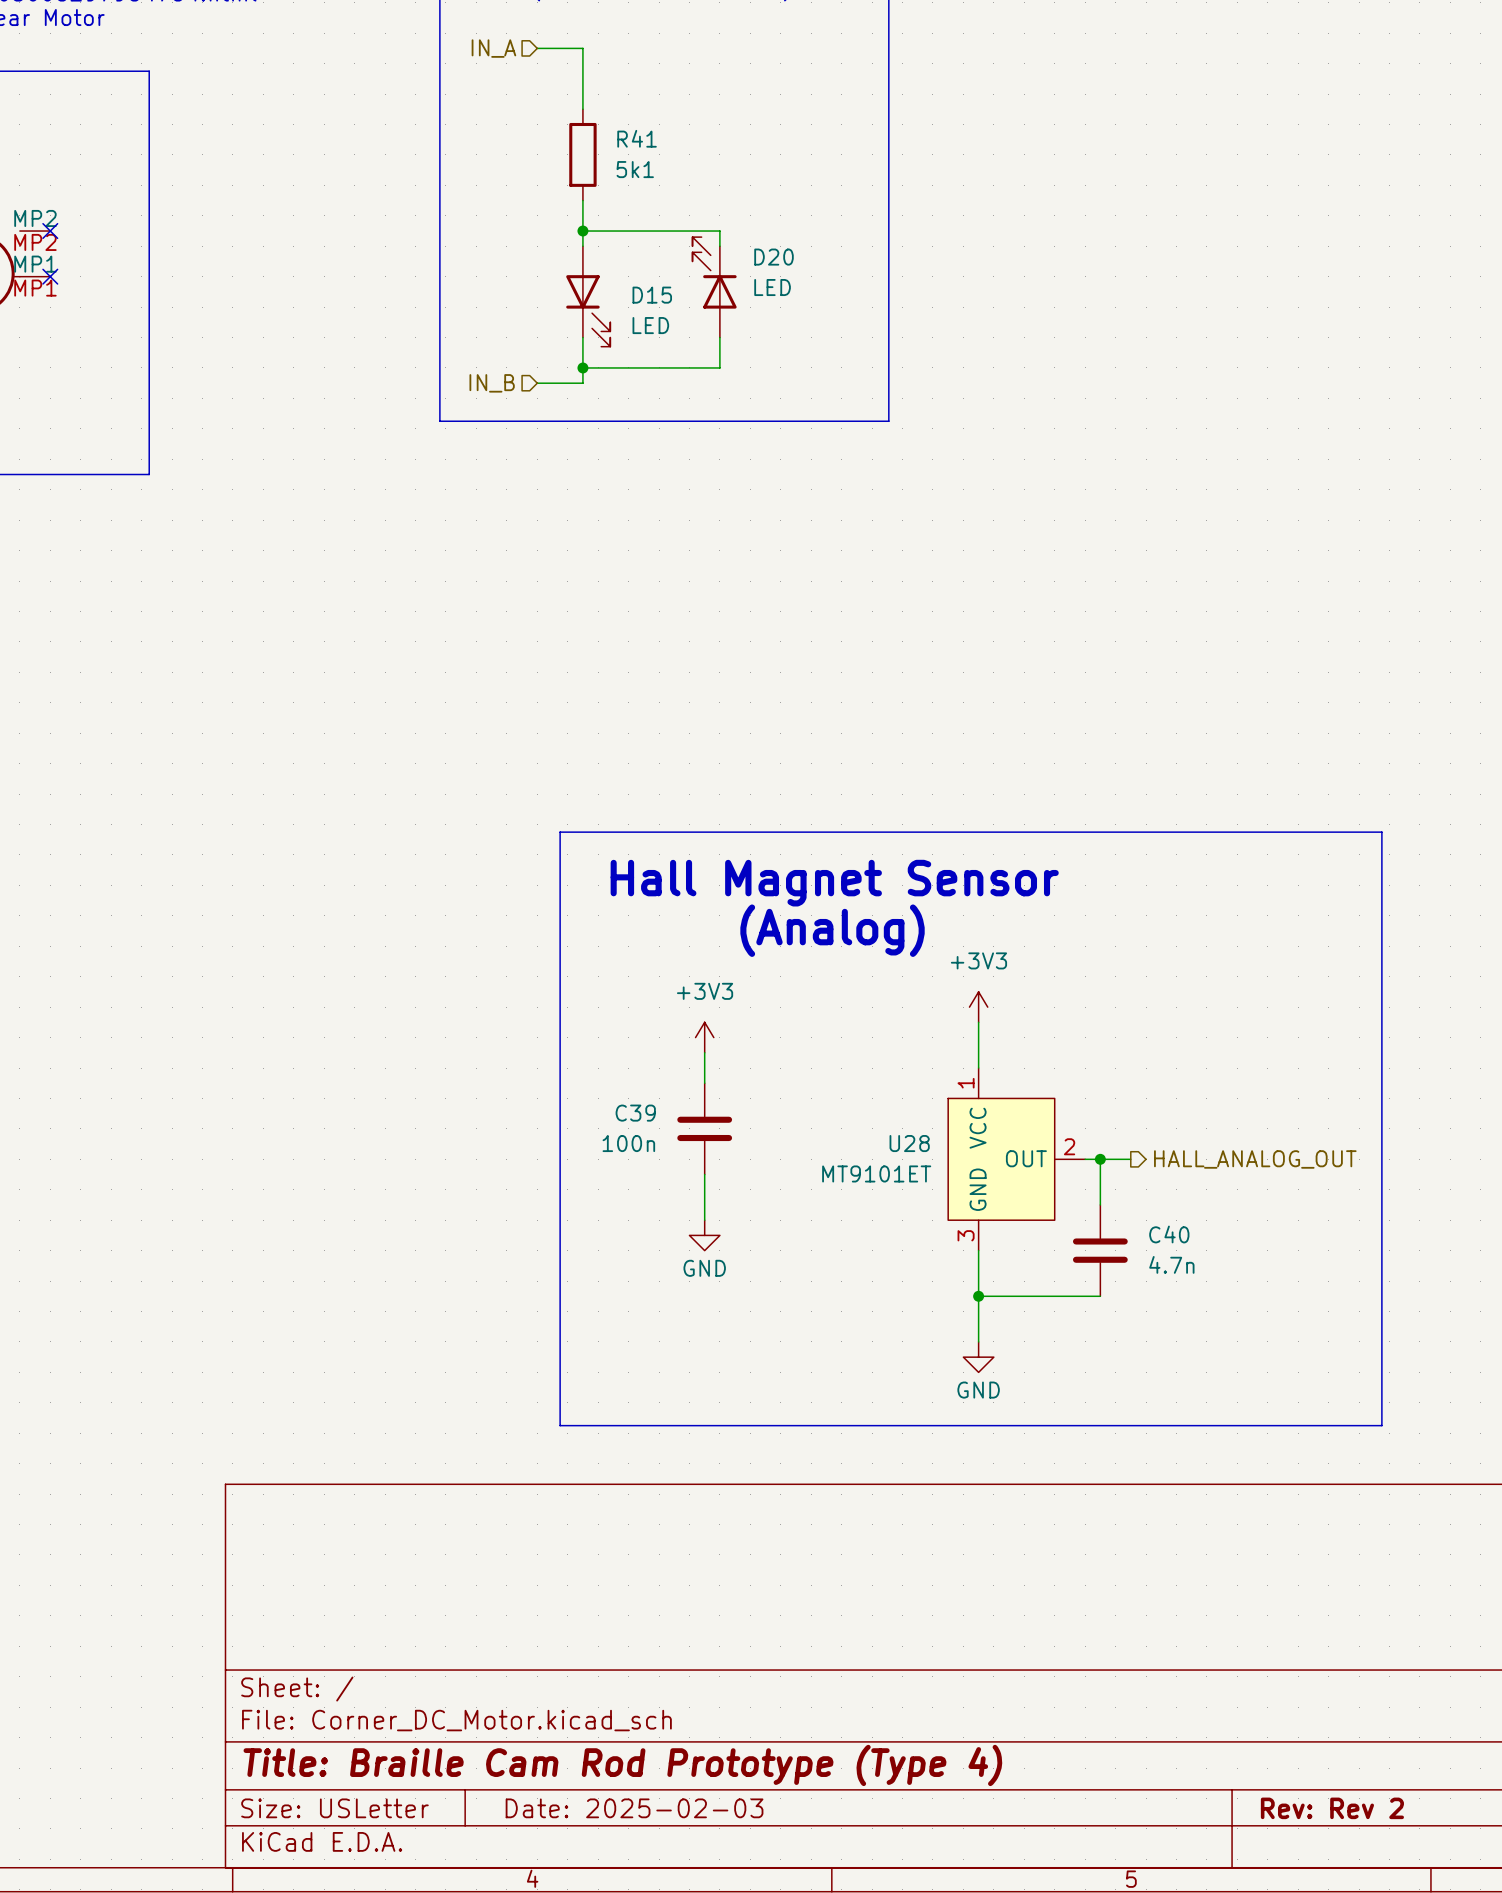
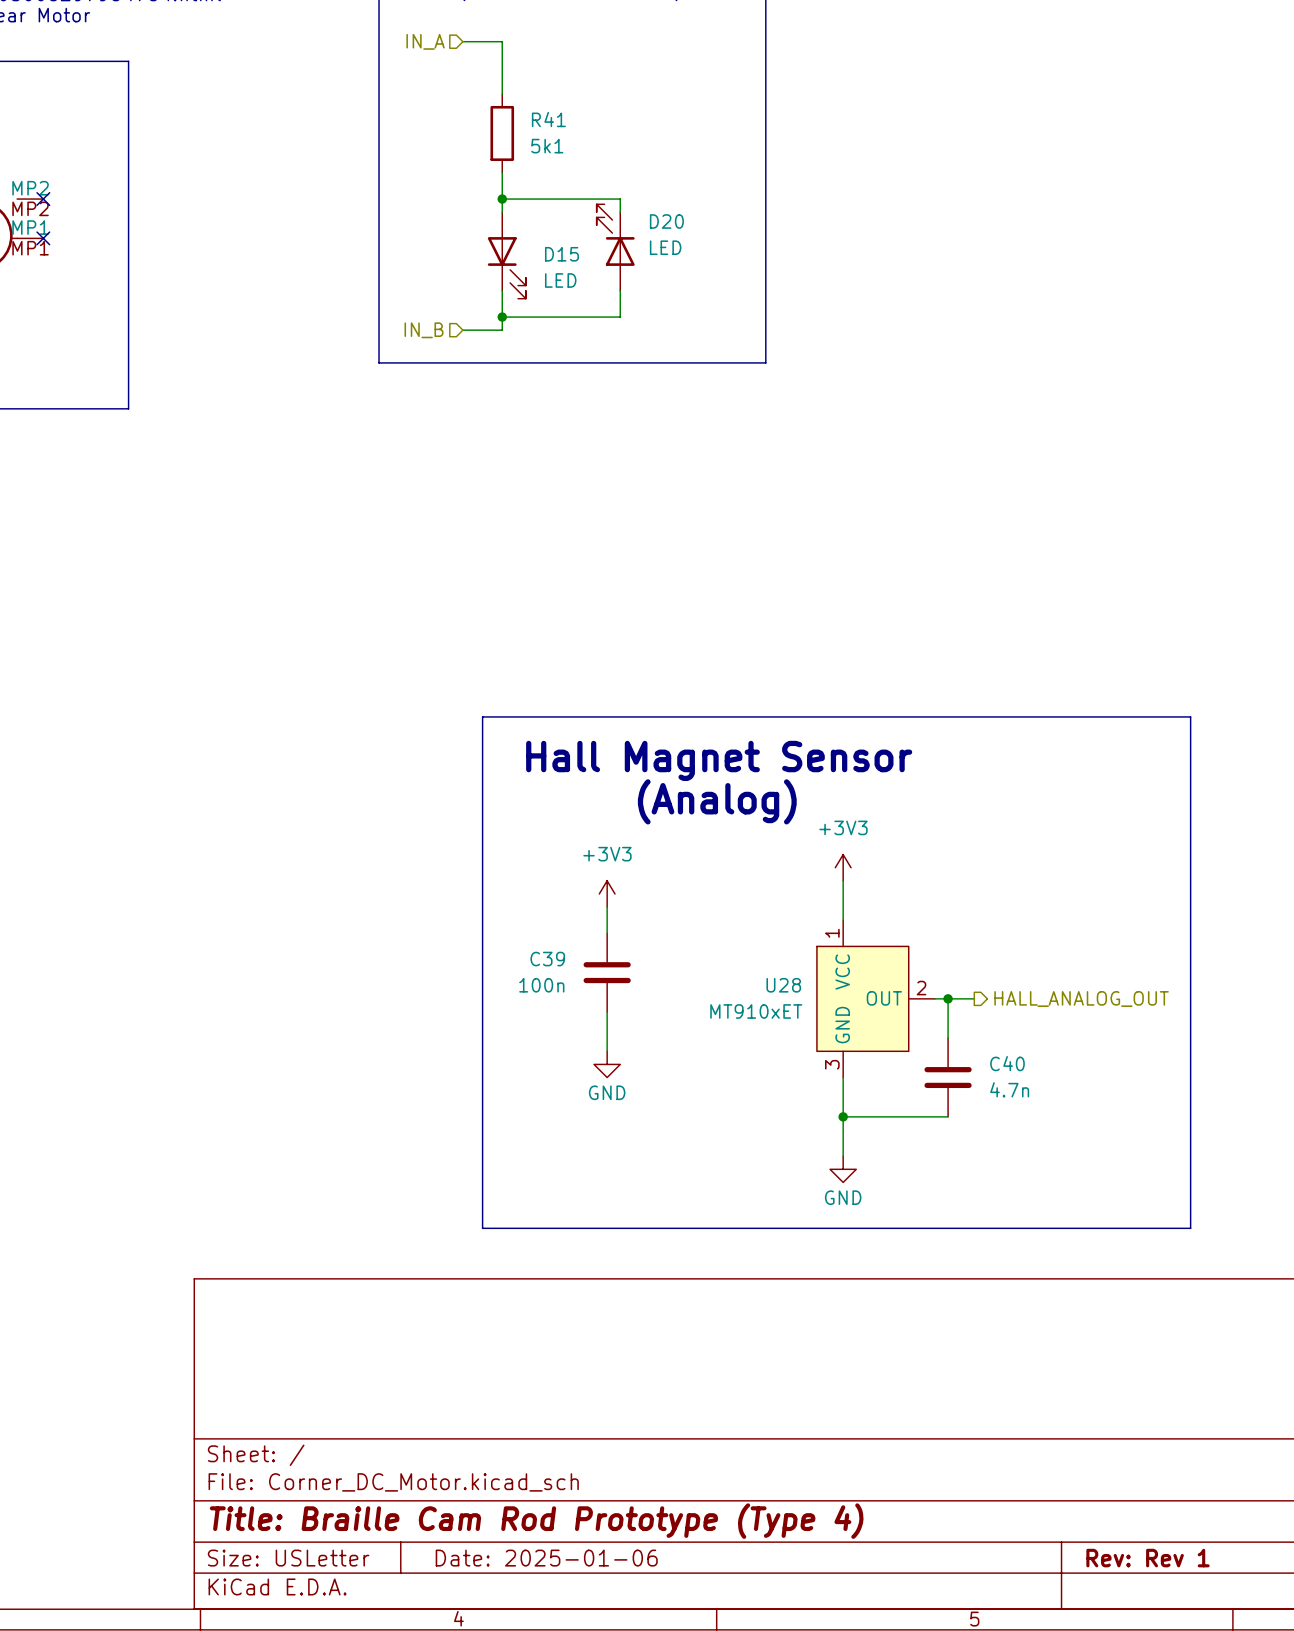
U28 value: MT9101ET (876, 1173) -> MT910xET (756, 1011)
title block: Date: 2025-02-03 (634, 1808) -> Date: 2025-01-06 (546, 1558)
title block: Rev: Rev 2 (1332, 1808) -> Rev: Rev 1 (1148, 1558)

